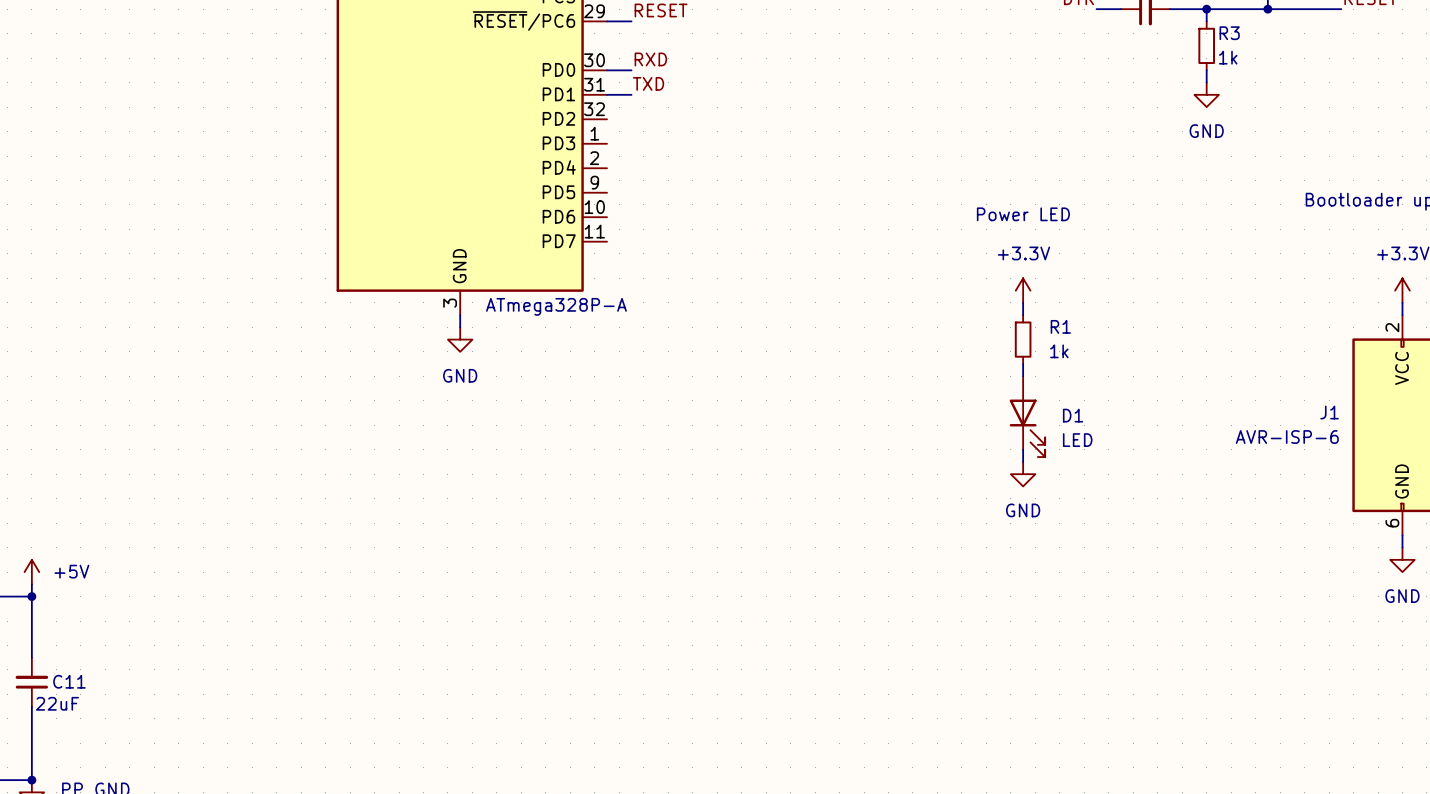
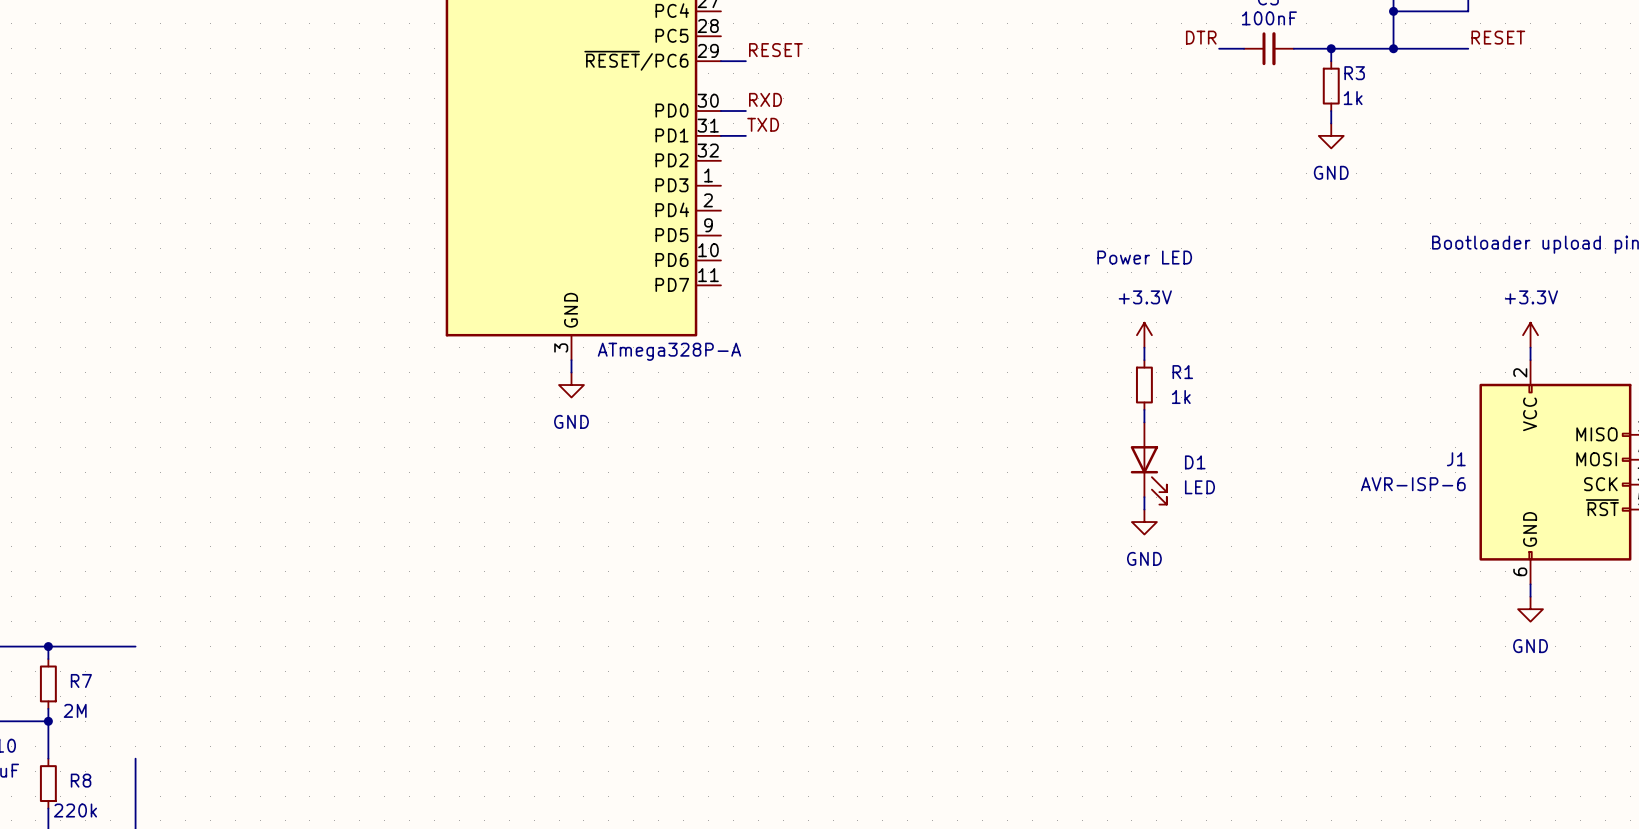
power symbol: +5V (31, 572) -> none
wire: (31, 584) (31, 657) -> none
junction: (31, 596) -> none
C11: 22uF (31, 682) -> none

